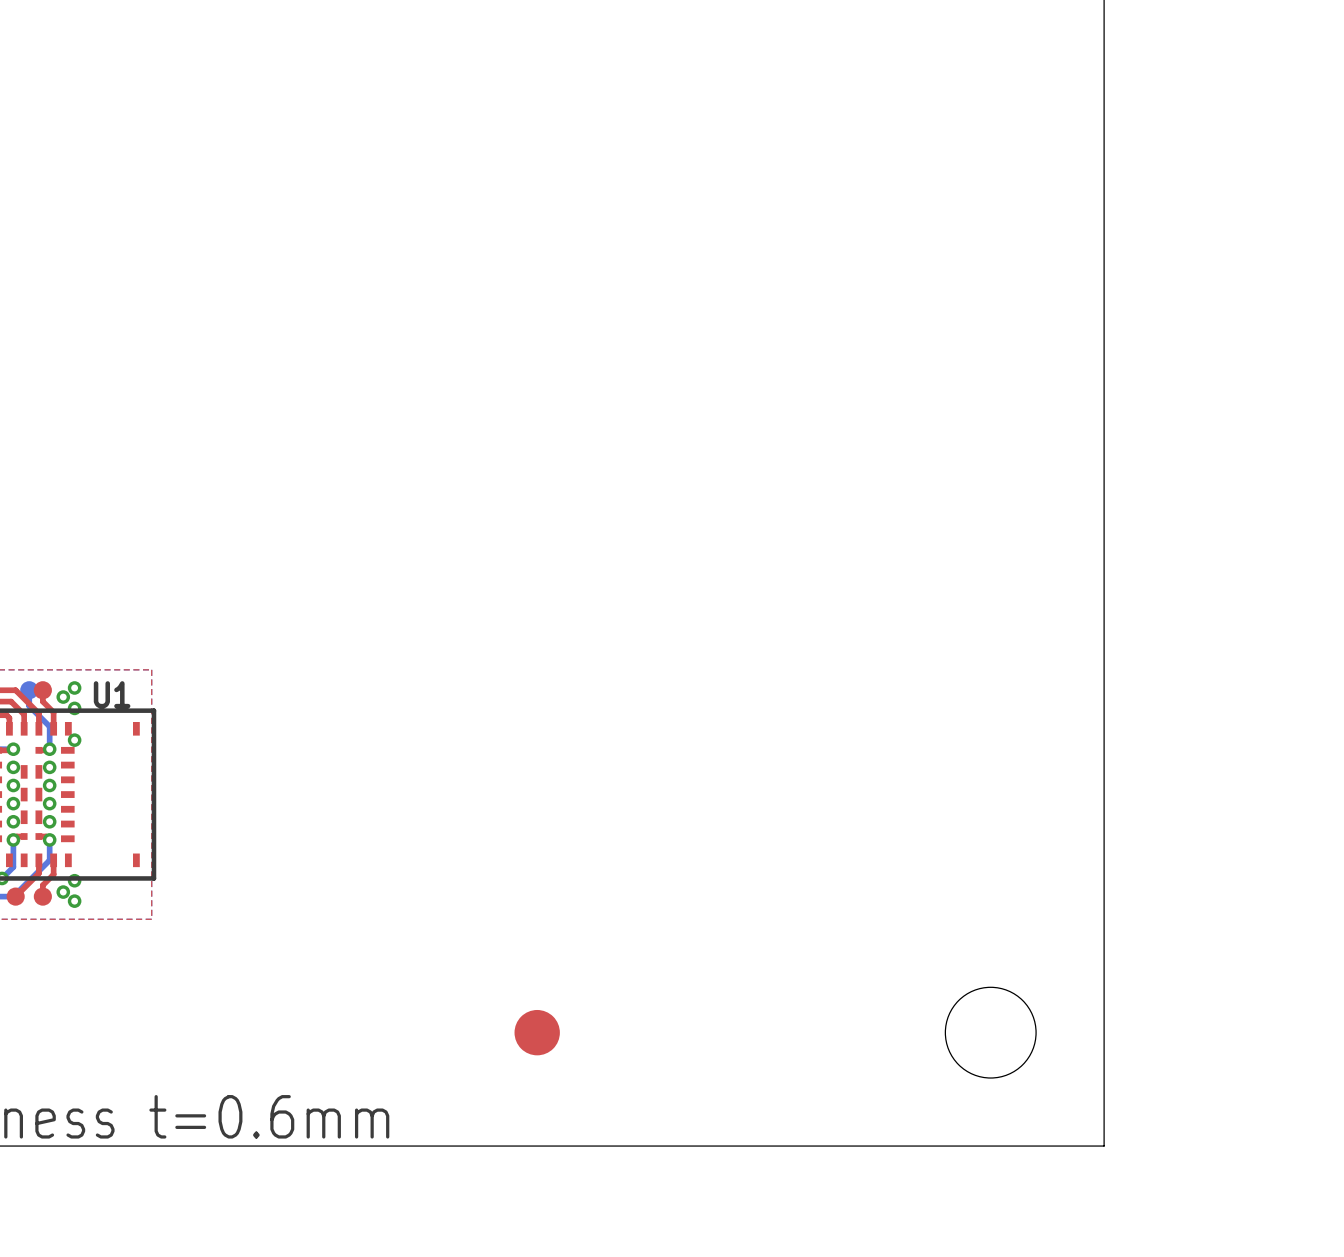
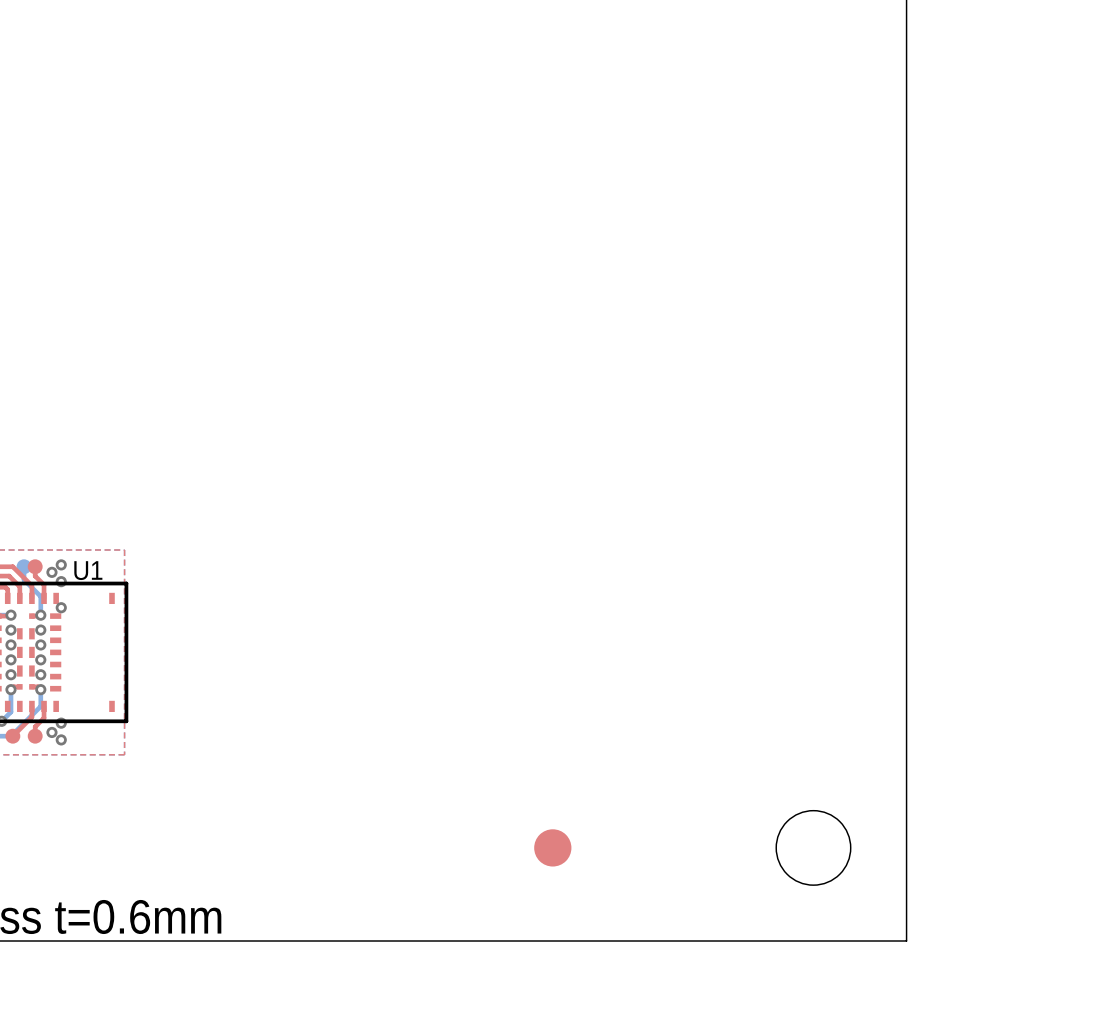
part position: (537, 1032) -> (552, 847)

